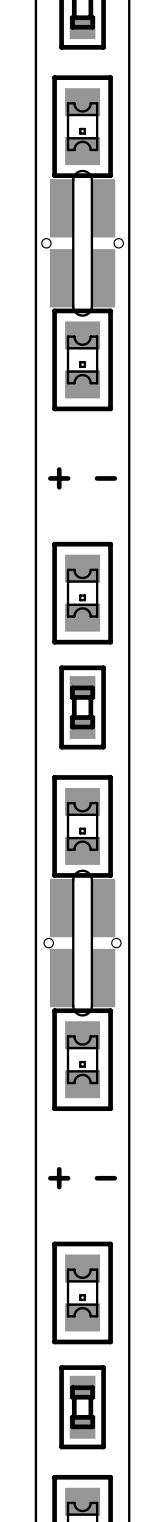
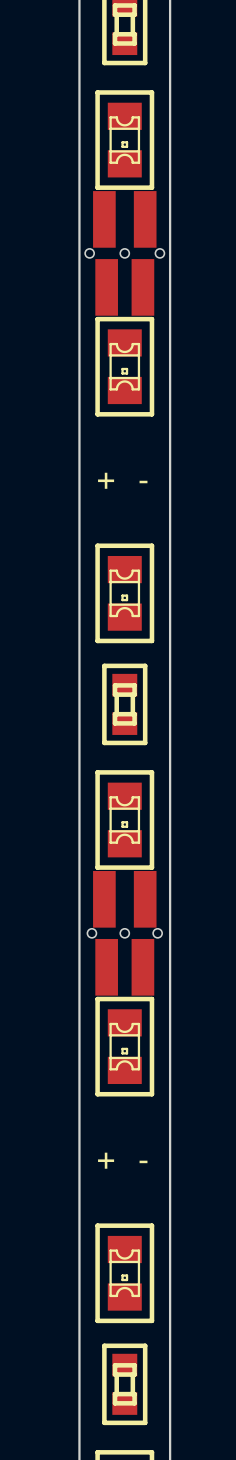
board edge: (73, 180) (73, 307) (76, 313) (83, 315) (89, 312) (91, 306) (91, 179) (88, 172) (81, 171) (75, 173) (73, 180) -> none
part footprint: [41, 238, 124, 308] -> [85, 248, 165, 316]
board edge: (73, 880) (73, 1007) (76, 1013) (83, 1015) (89, 1012) (91, 1006) (91, 878) (88, 872) (81, 870) (75, 873) (73, 880) -> none
part footprint: [44, 938, 122, 1008] -> [87, 928, 163, 996]

